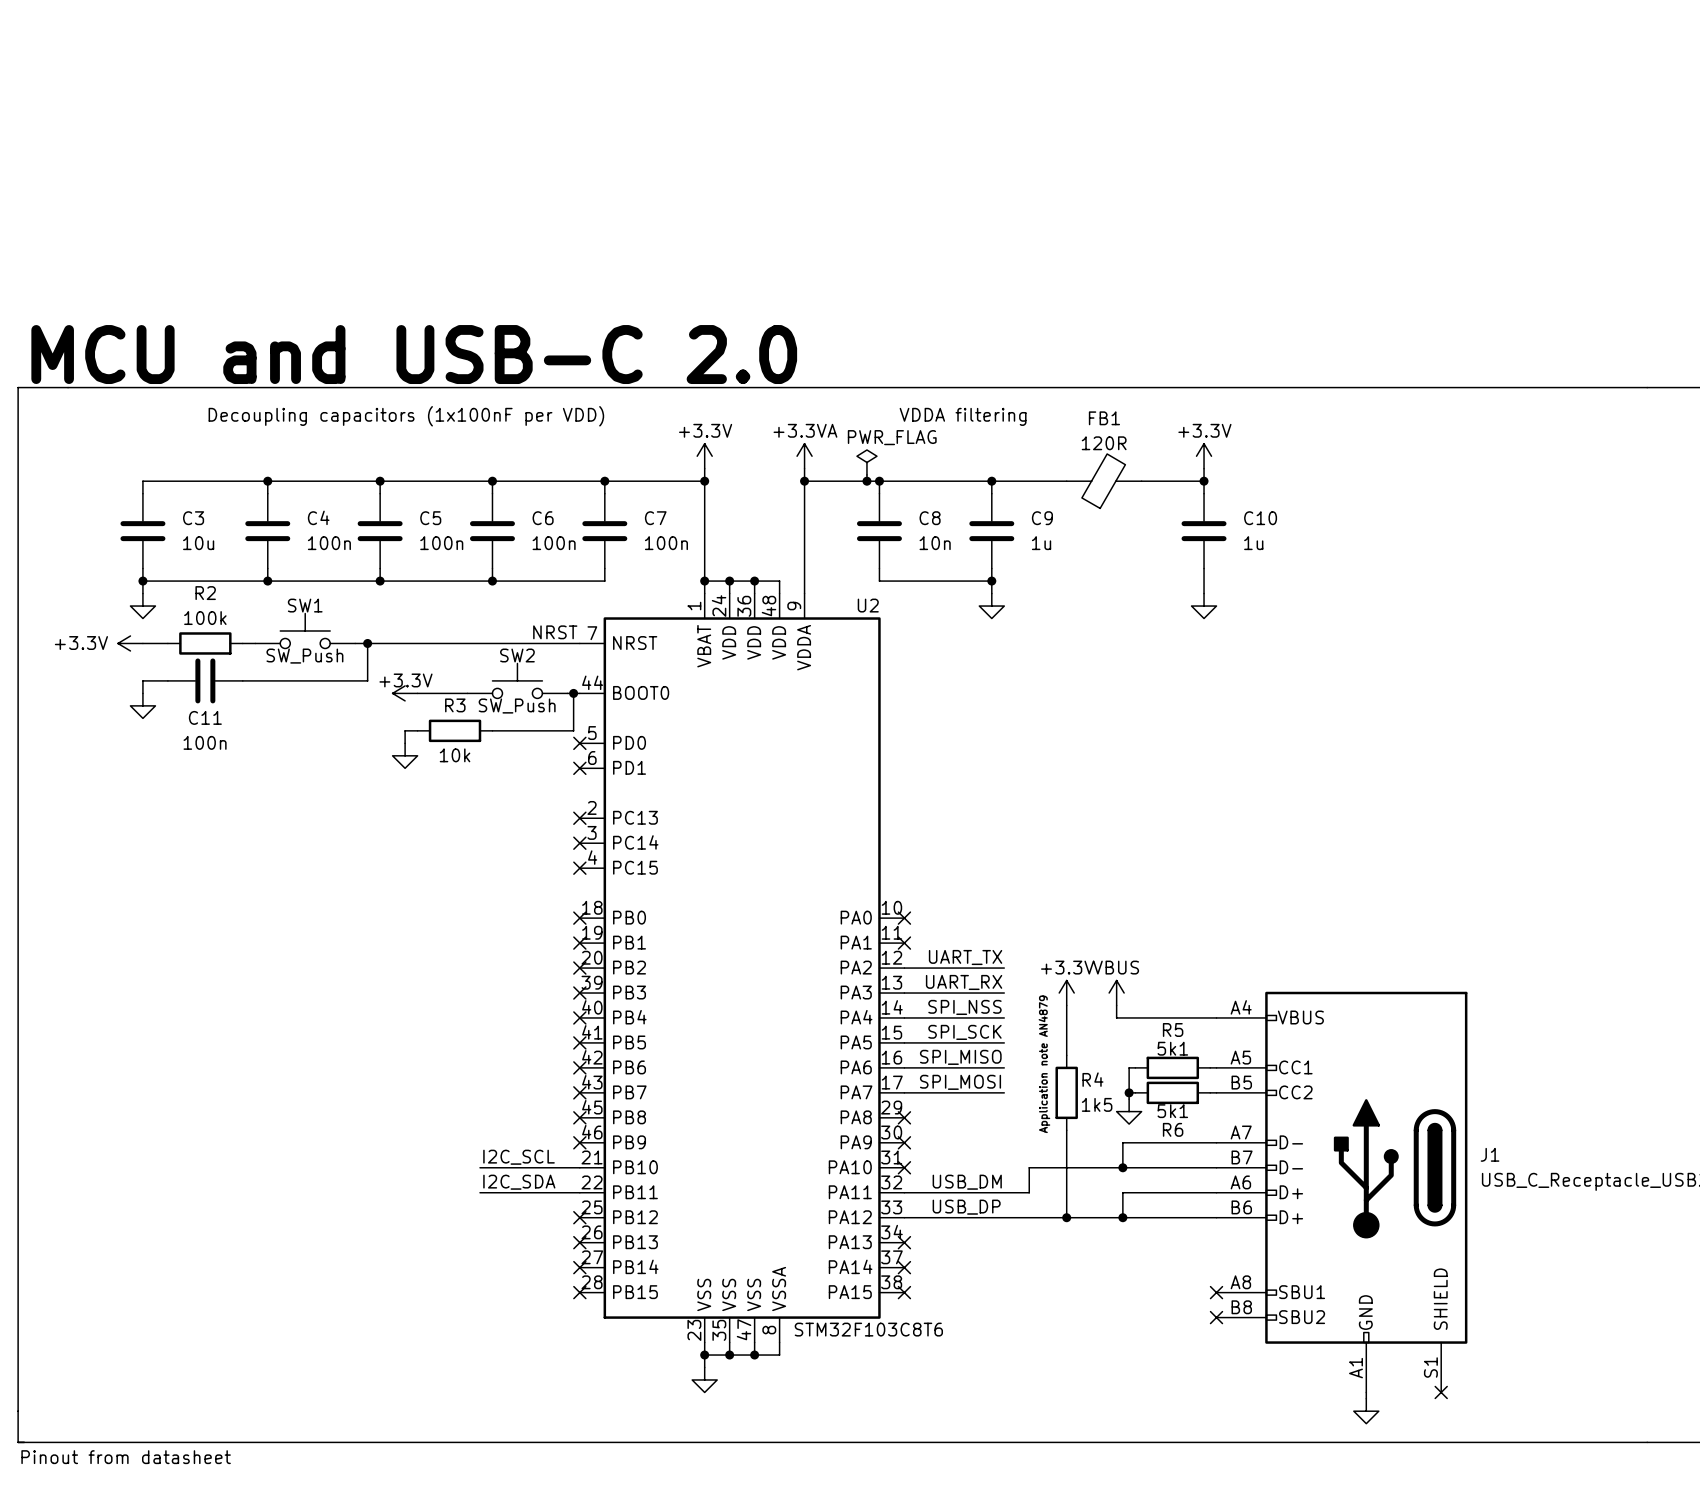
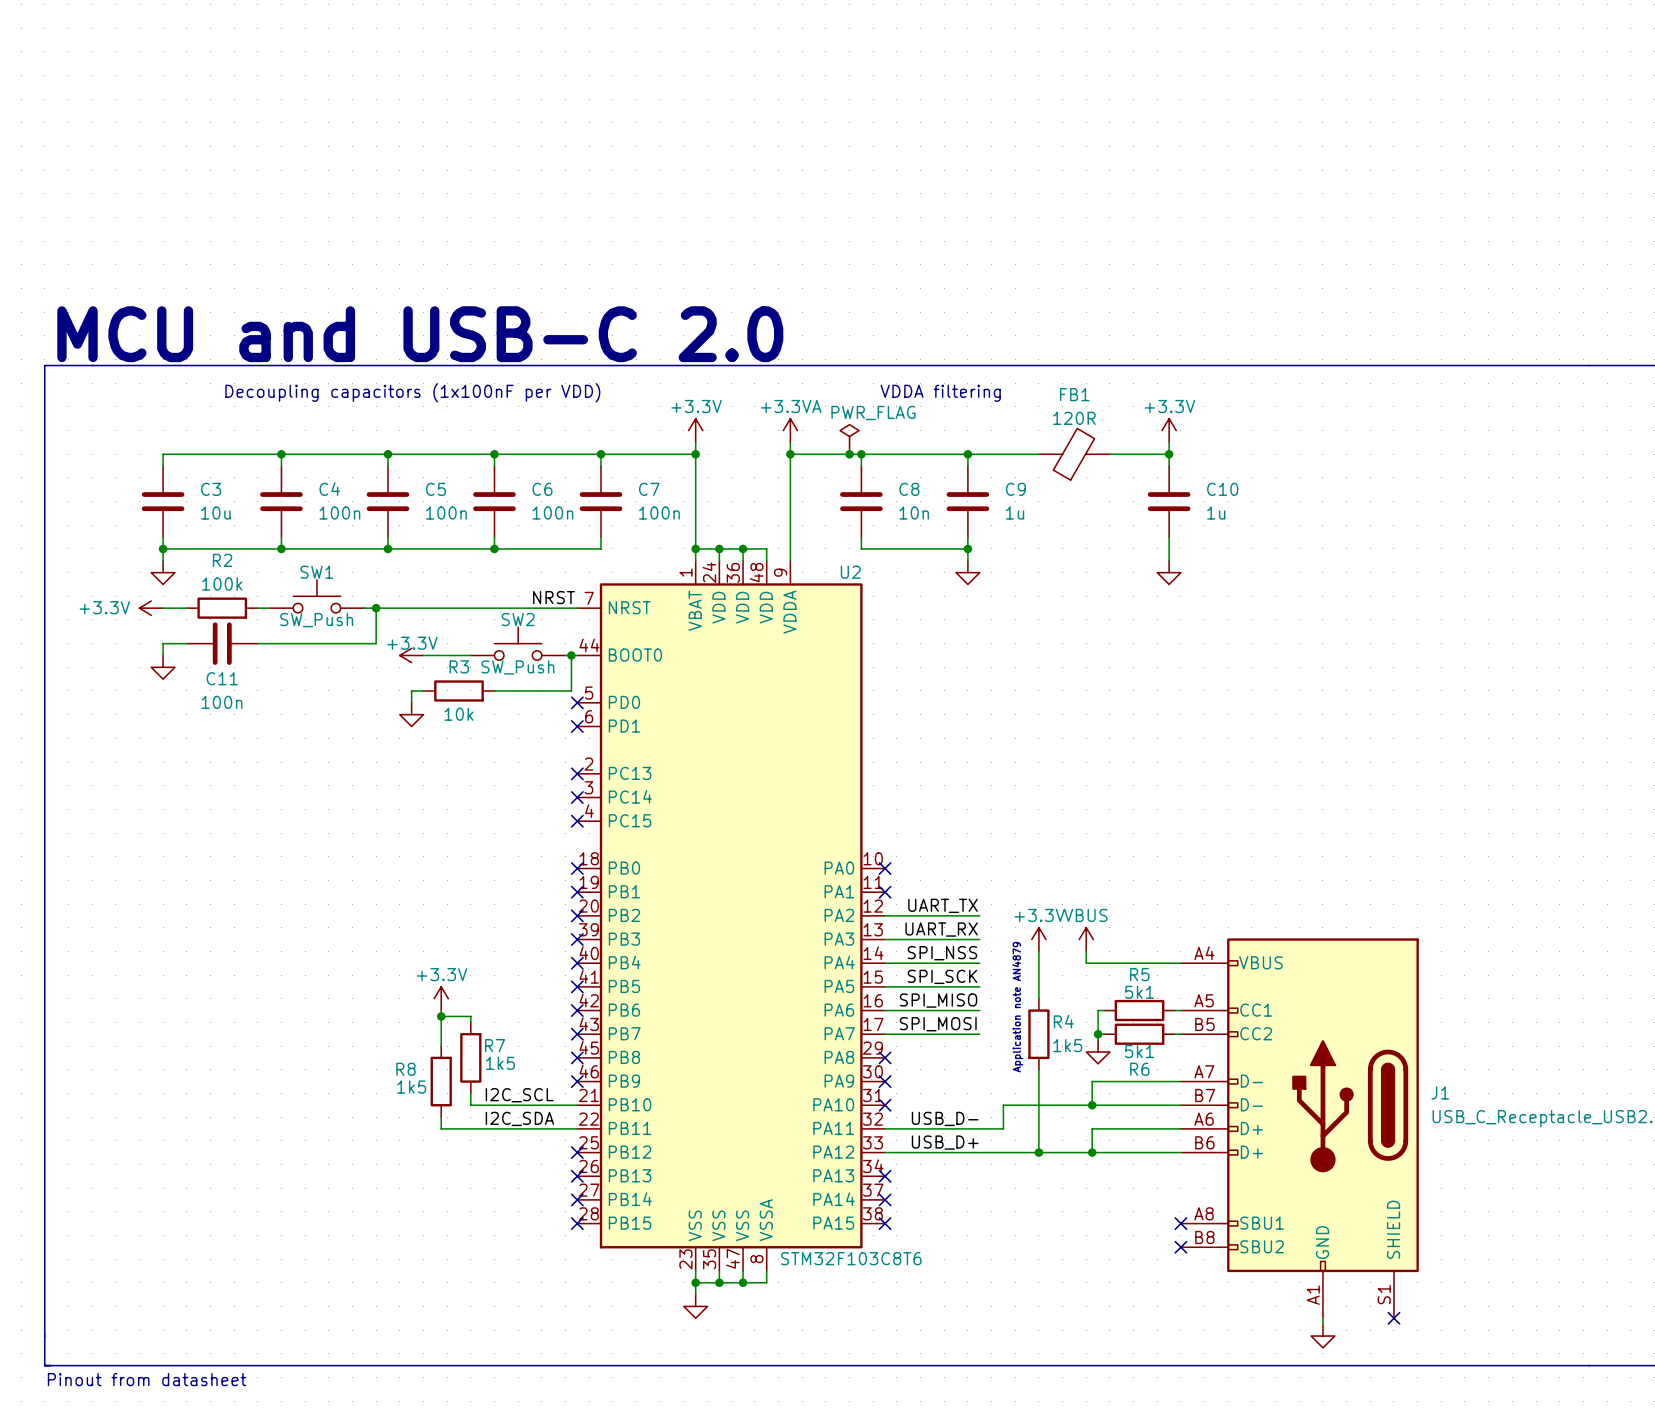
power symbol: none -> +3.3V (441, 998)
wire: none -> (441, 1010) (441, 1046)
wire: none -> (441, 1016) (470, 1016) (470, 1022)
junction: none -> (441, 1016)
R7: none -> 1k5 (470, 1057)
R8: none -> 1k5 (441, 1081)
wire: none -> (470, 1093) (470, 1105) (482, 1105)
wire: none -> (441, 1117) (441, 1128) (482, 1128)
label: USB_DM (967, 1182) -> USB_D- (945, 1118)
label: USB_DP (966, 1207) -> USB_D+ (945, 1142)

